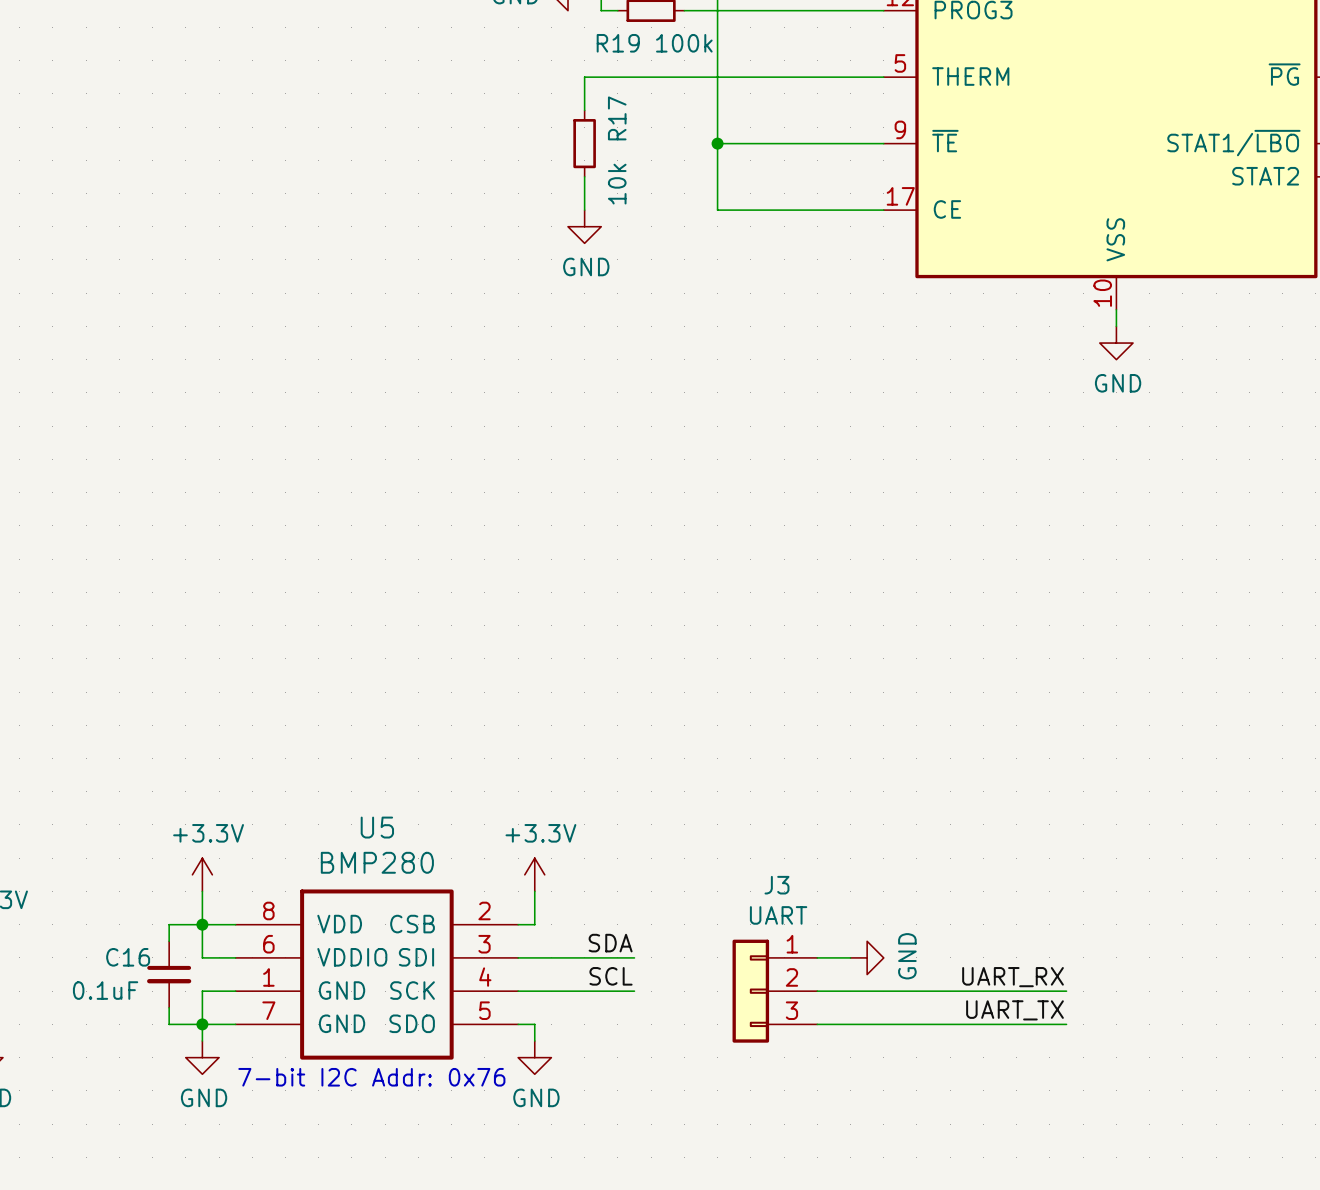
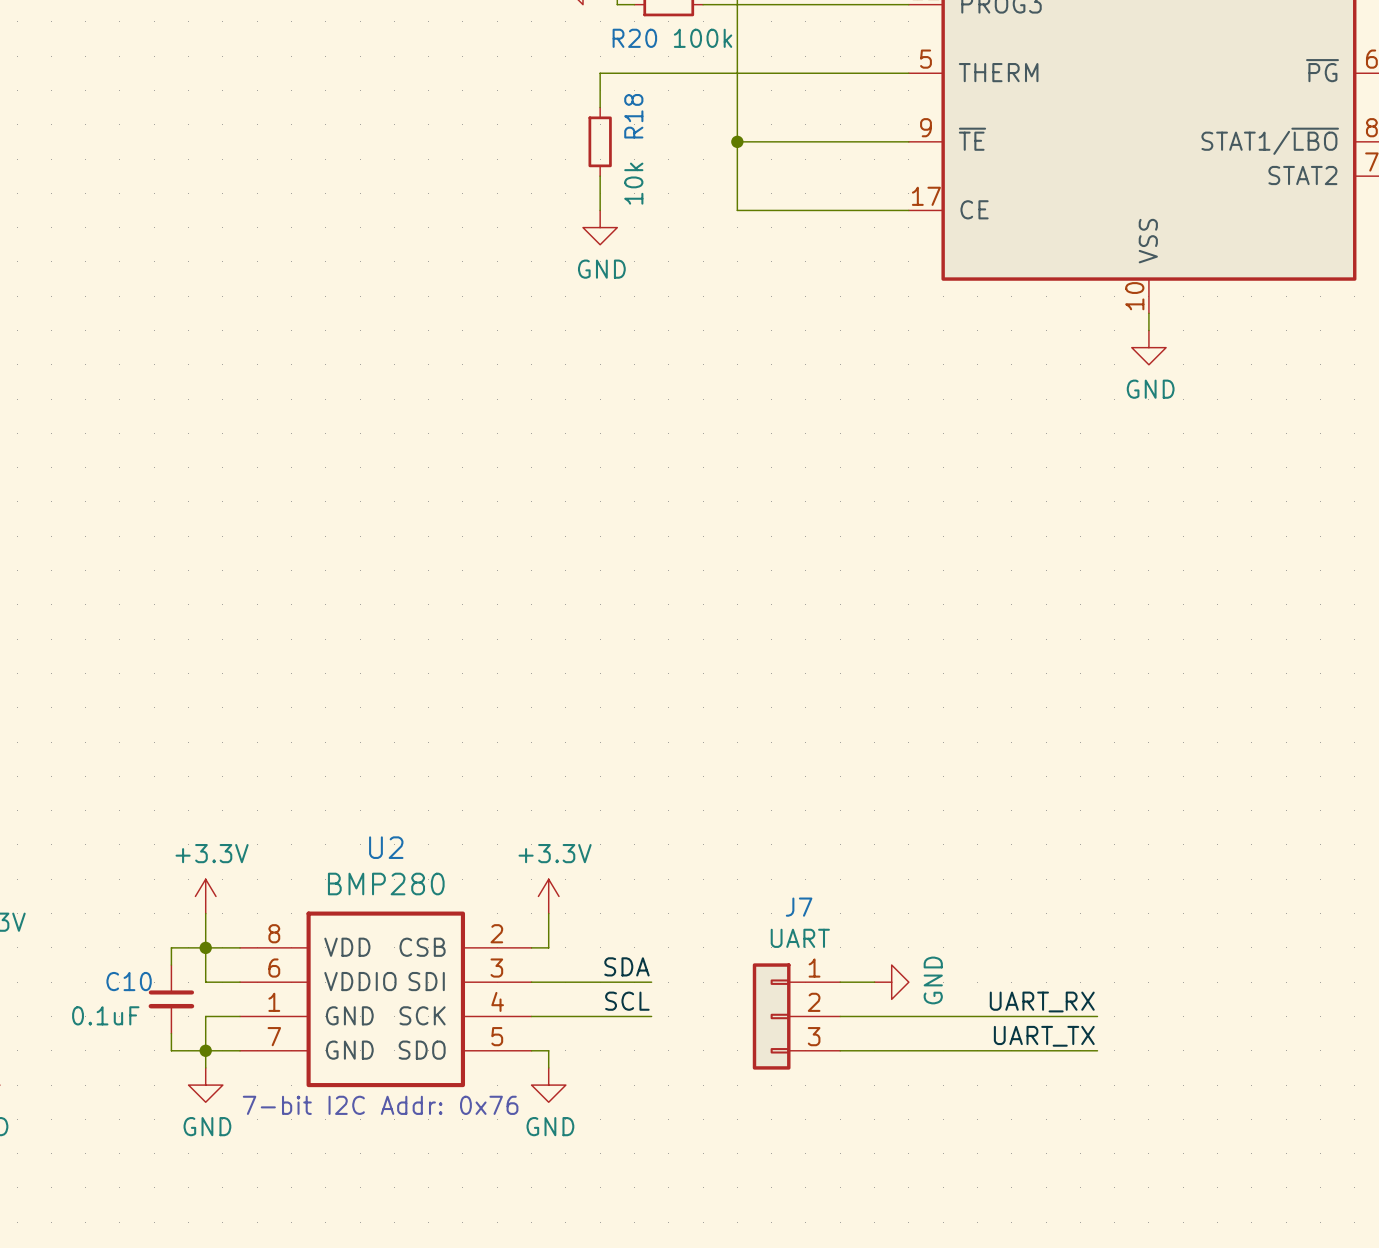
R19 name: R19 (618, 43) -> R20 (634, 38)
R17 name: R17 (617, 118) -> R18 (633, 116)
U5 name: U5 (377, 827) -> U2 (386, 847)
J3 name: J3 (777, 885) -> J7 (799, 907)
C16 name: C16 (128, 957) -> C10 (129, 981)

